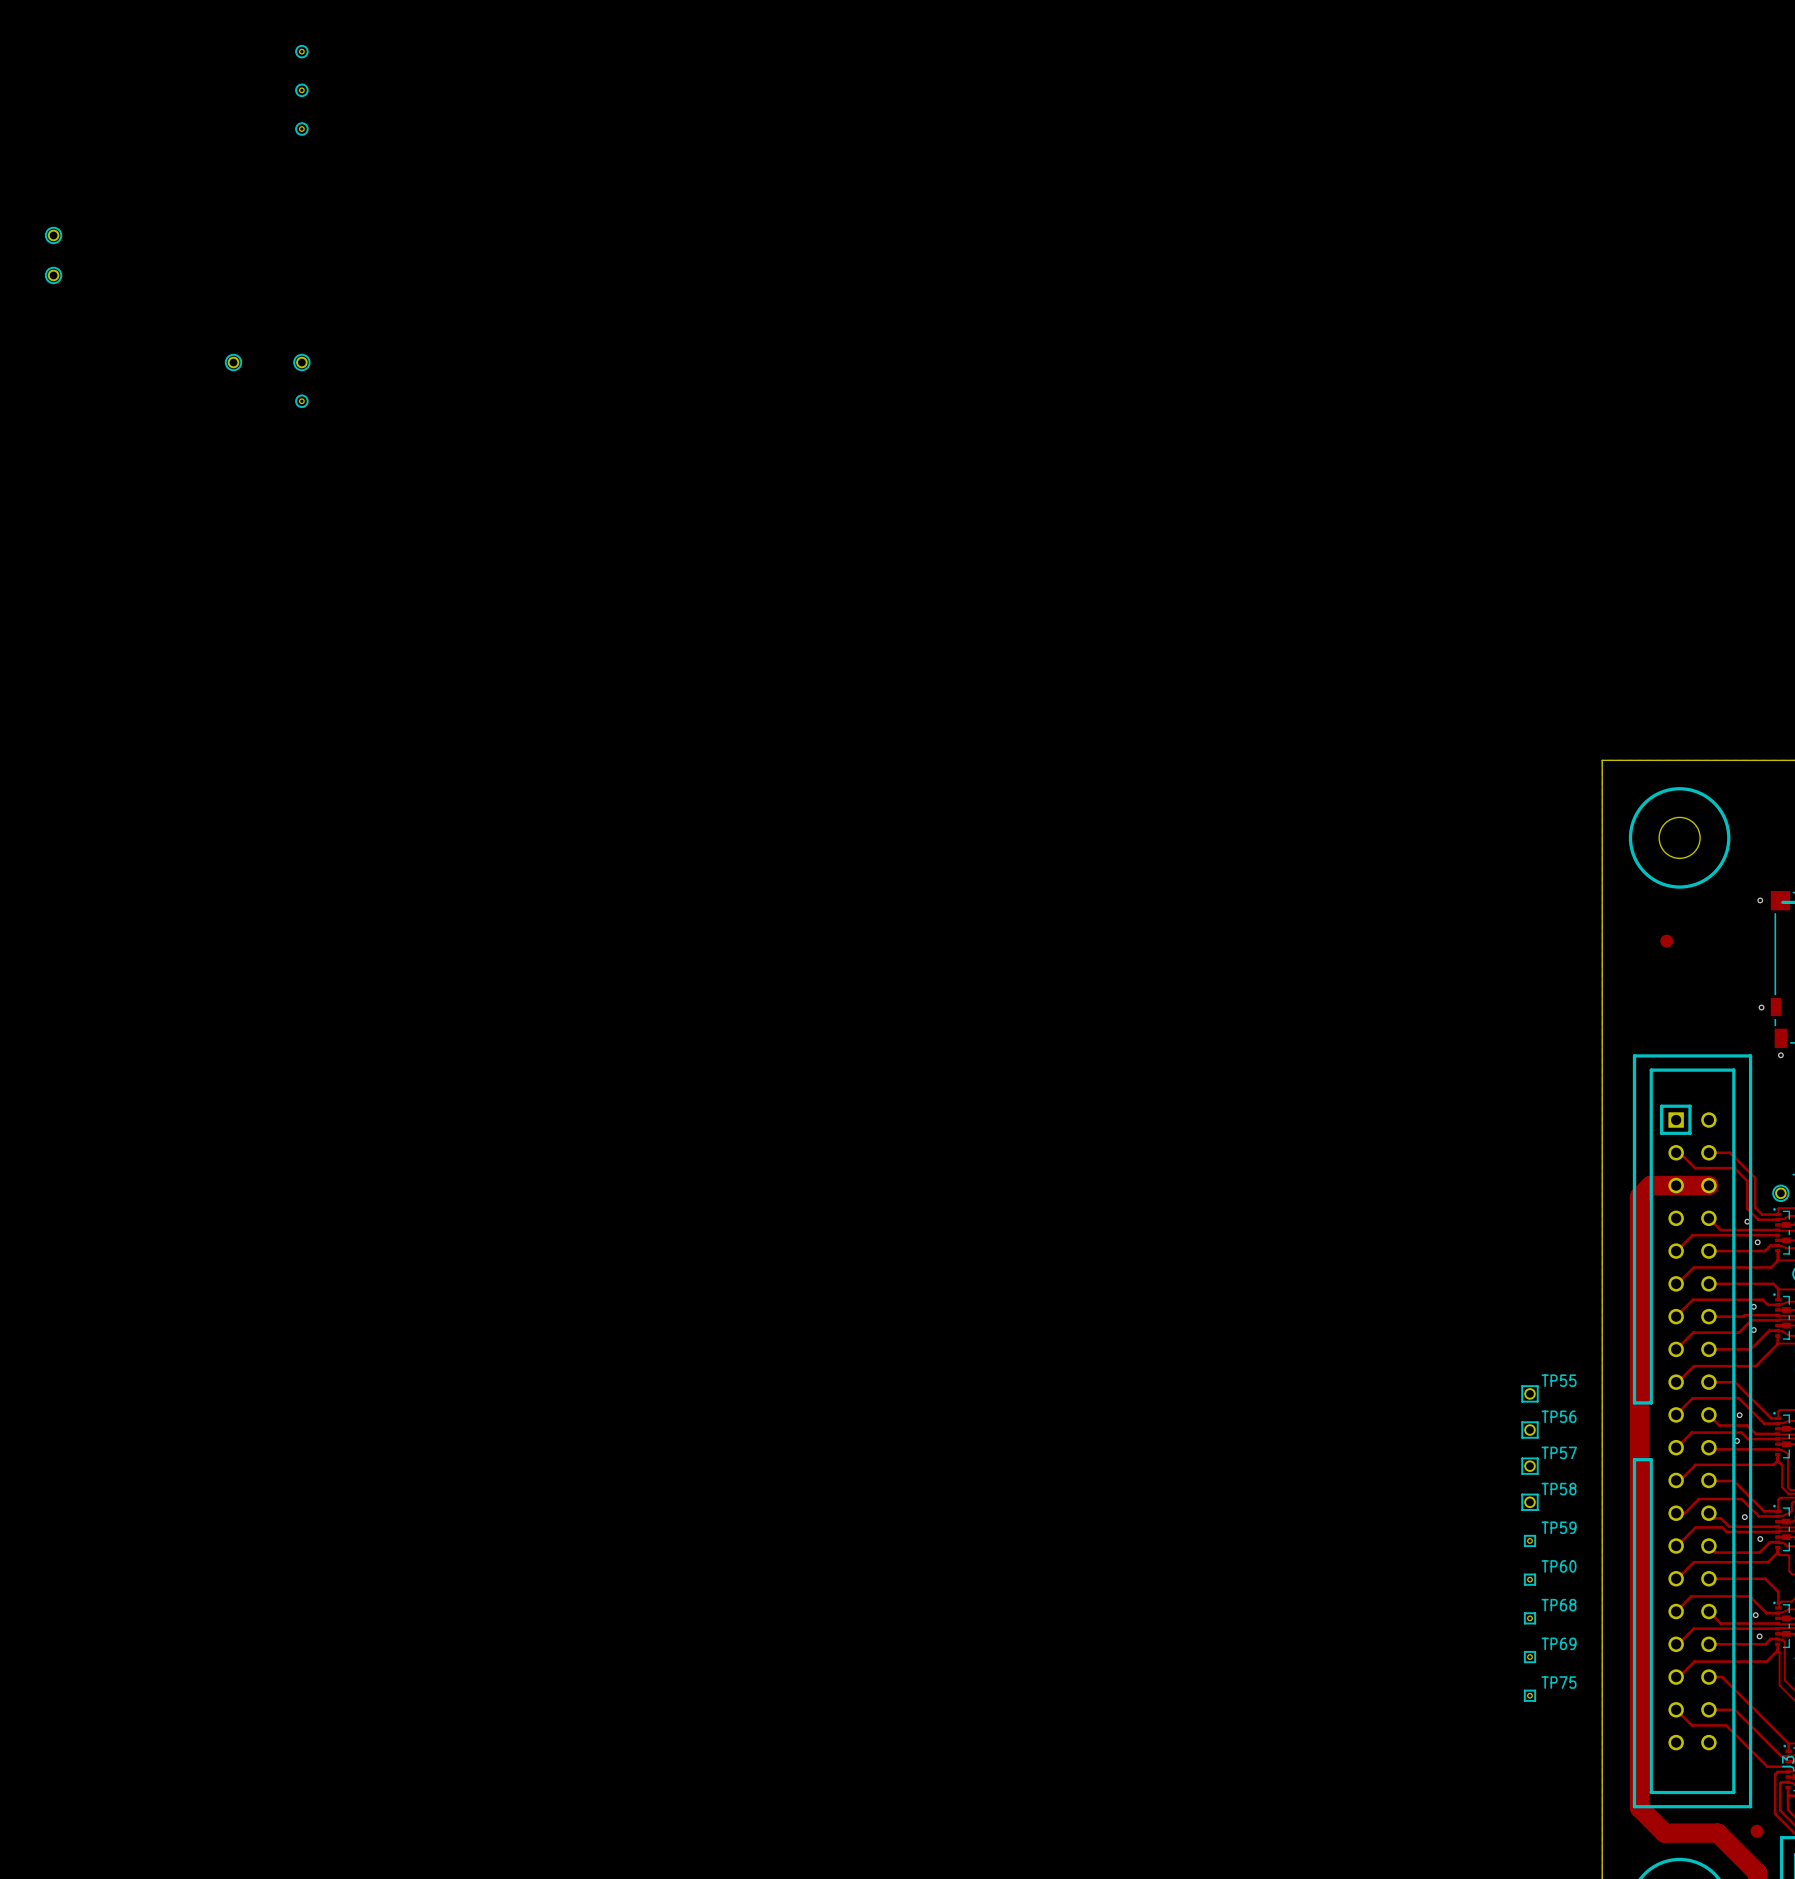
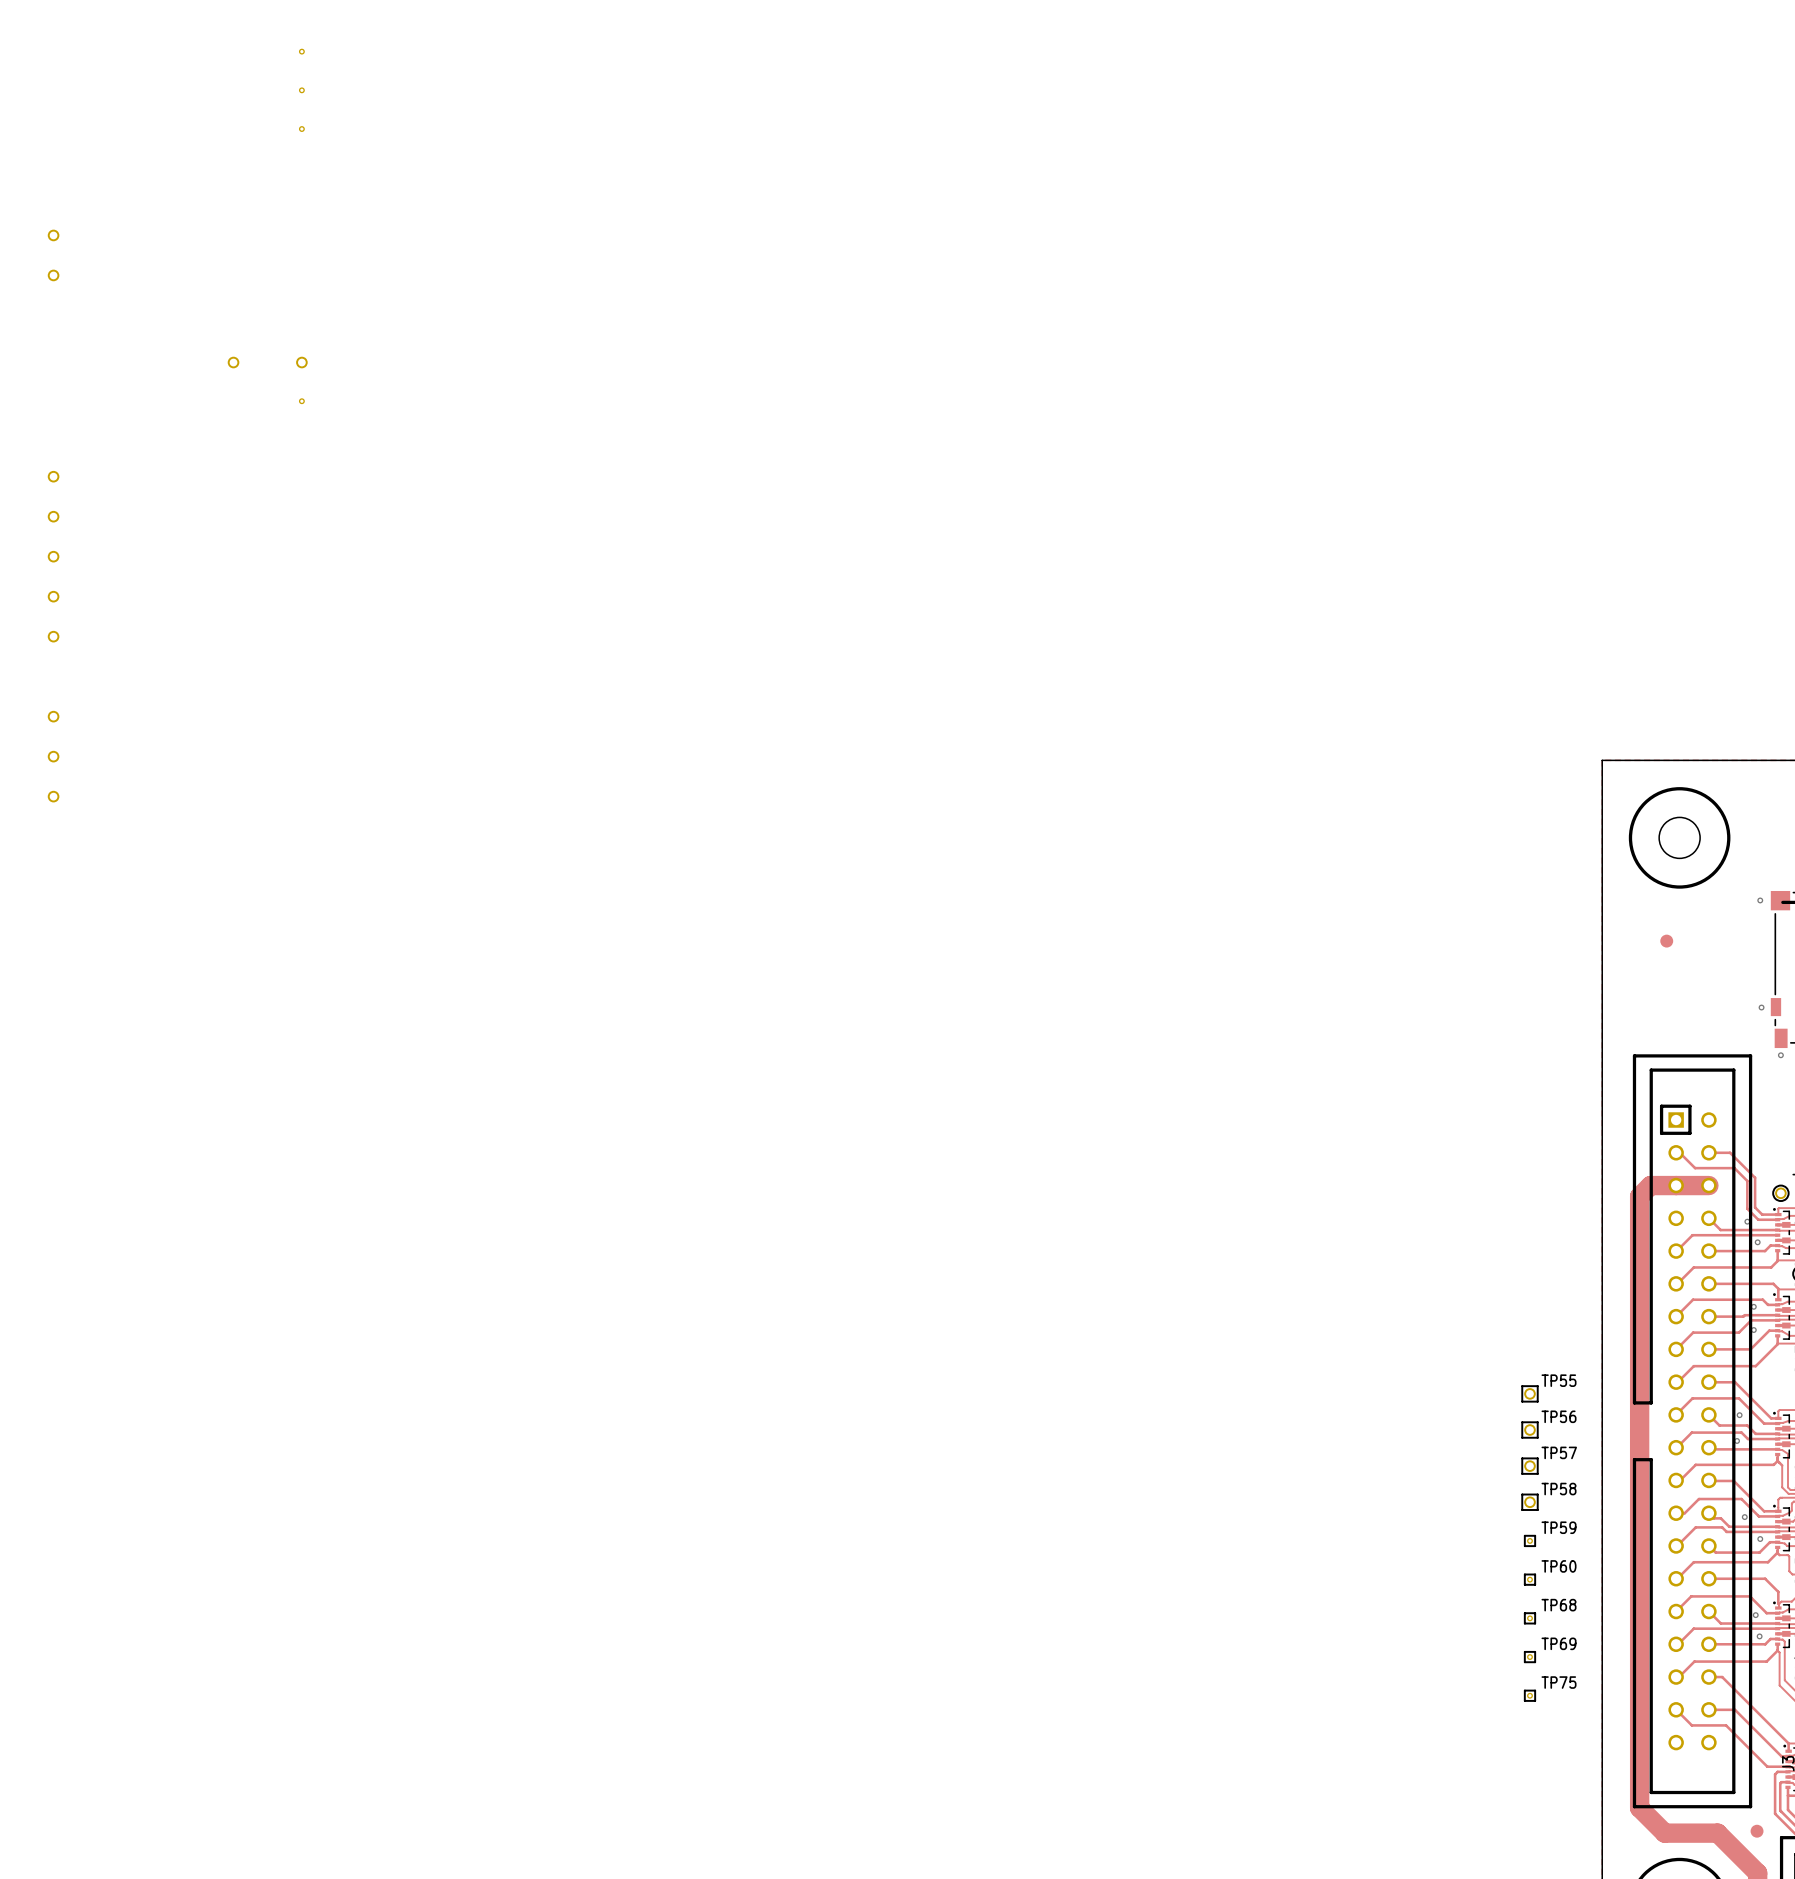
part footprint: [295, 44, 309, 59] -> [298, 48, 305, 55]
part footprint: [295, 83, 309, 98] -> [298, 87, 305, 94]
part footprint: [295, 122, 309, 136] -> [298, 126, 305, 132]
part footprint: [44, 226, 63, 245] -> [47, 229, 60, 242]
part footprint: [44, 266, 63, 285] -> [47, 269, 60, 282]
part footprint: [224, 353, 243, 372] -> [227, 356, 240, 369]
part footprint: [293, 353, 311, 372] -> [296, 356, 308, 369]
part footprint: [295, 394, 309, 408] -> [298, 398, 305, 405]
part: none -> (53, 476)
part: none -> (53, 516)
part: none -> (53, 556)
part: none -> (53, 596)
part: none -> (53, 636)
part: none -> (53, 716)
part: none -> (53, 756)
part: none -> (53, 796)

